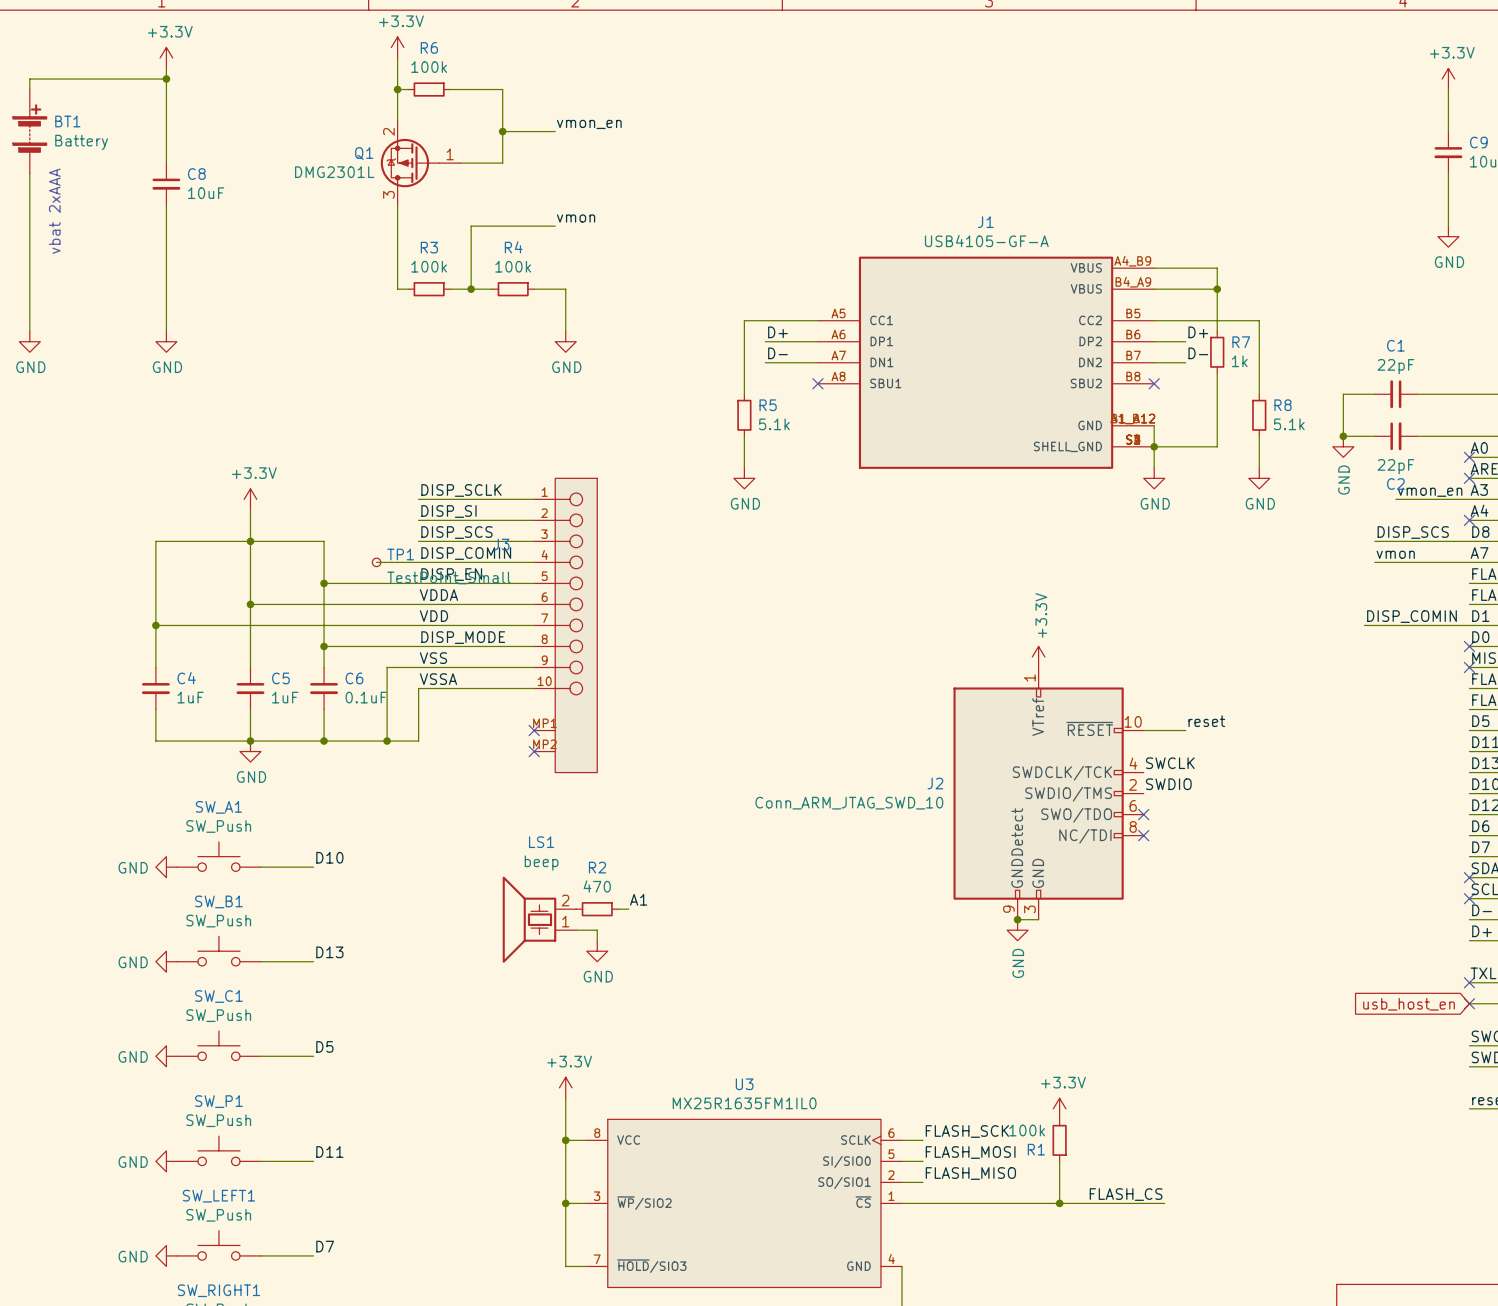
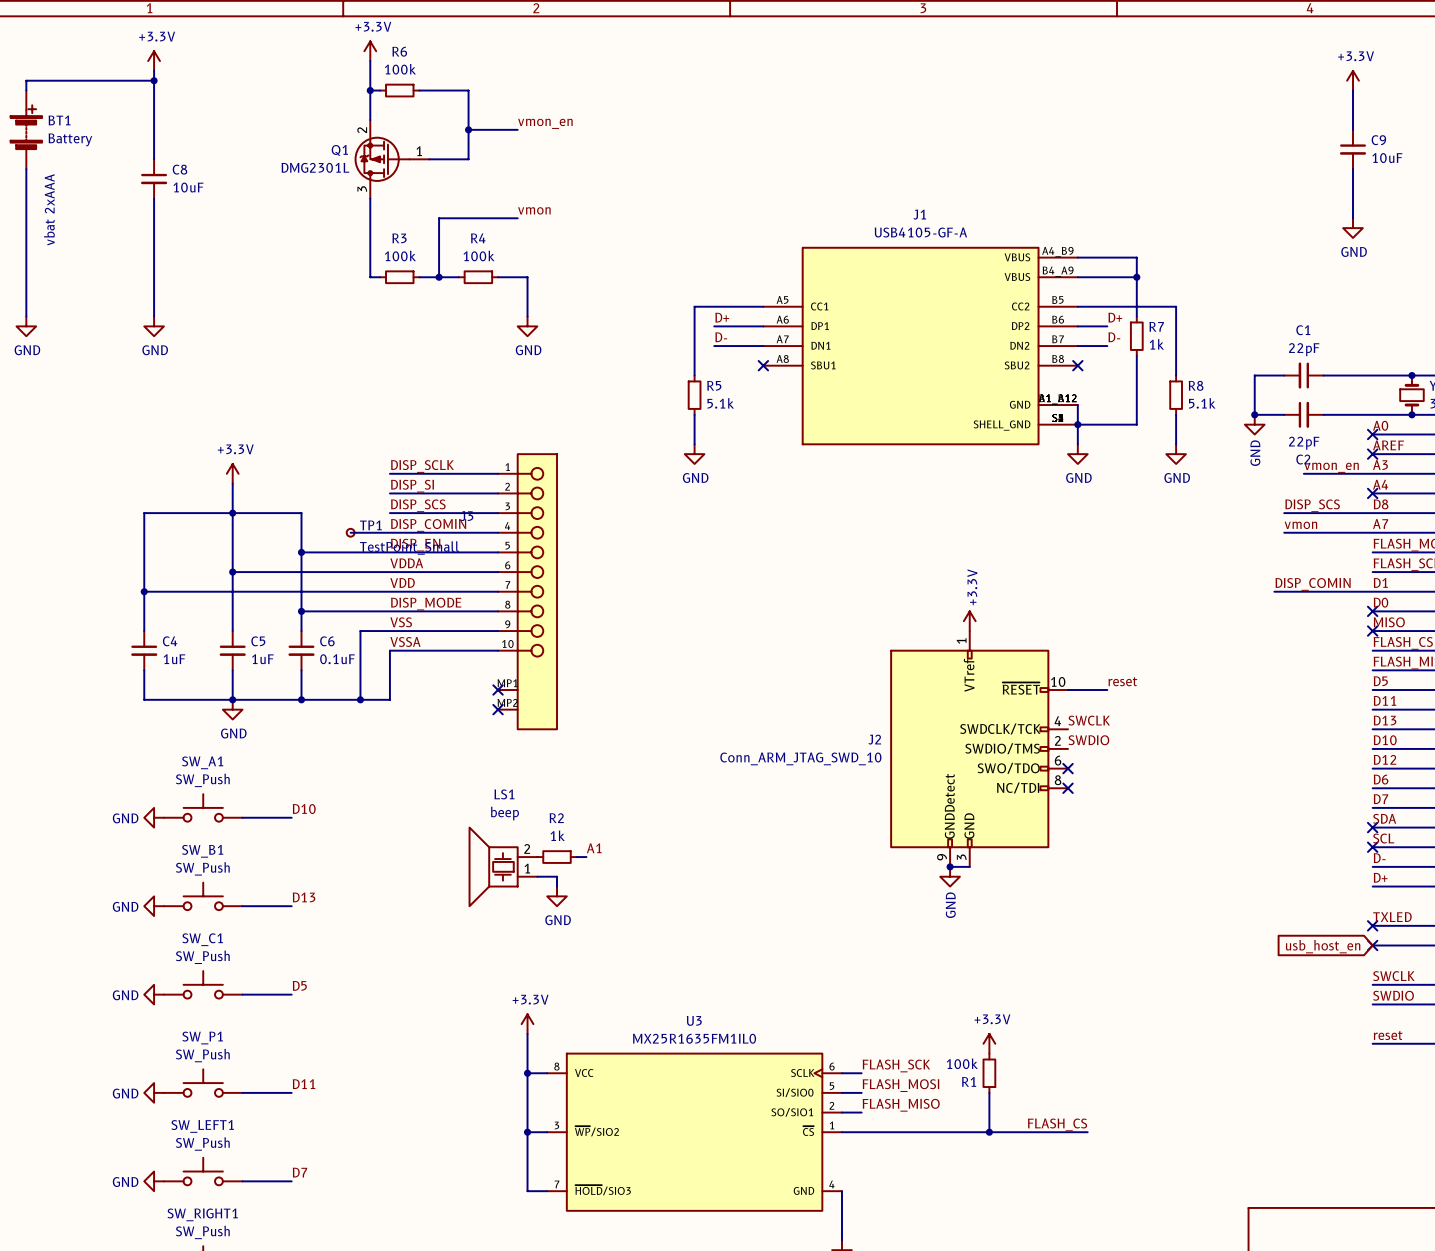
R2 value: 470 (597, 886) -> 1k (557, 835)

